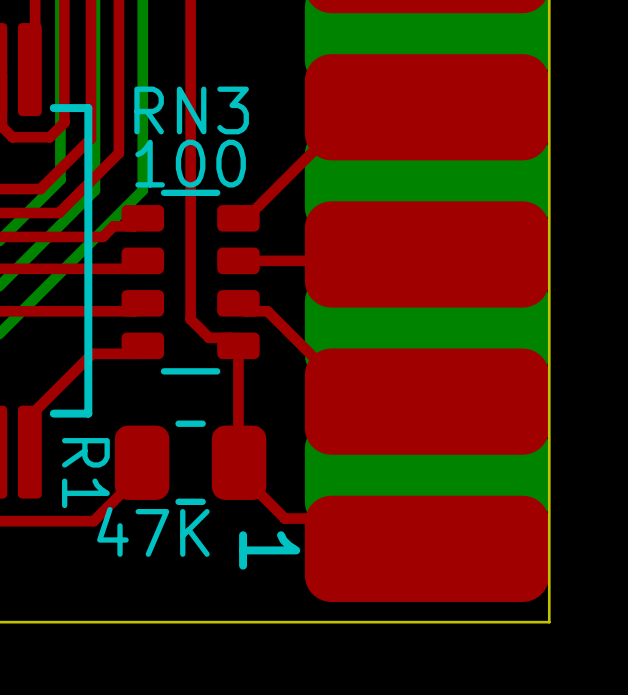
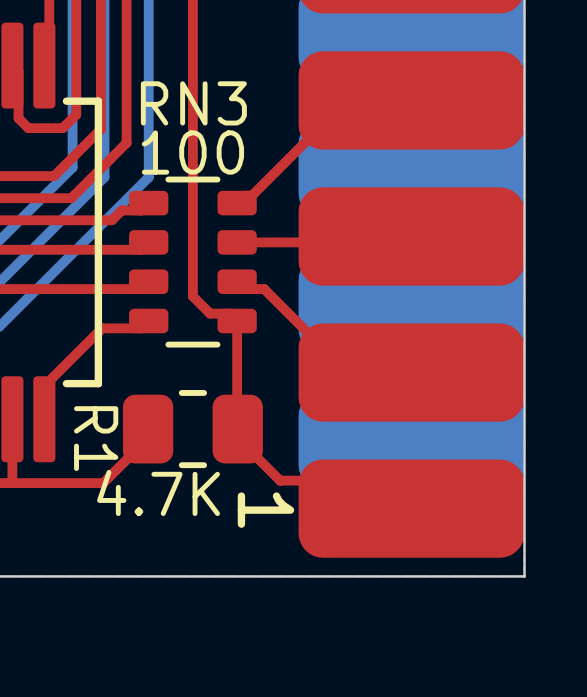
R1 value: 47K (153, 531) -> 4.7K (158, 492)

